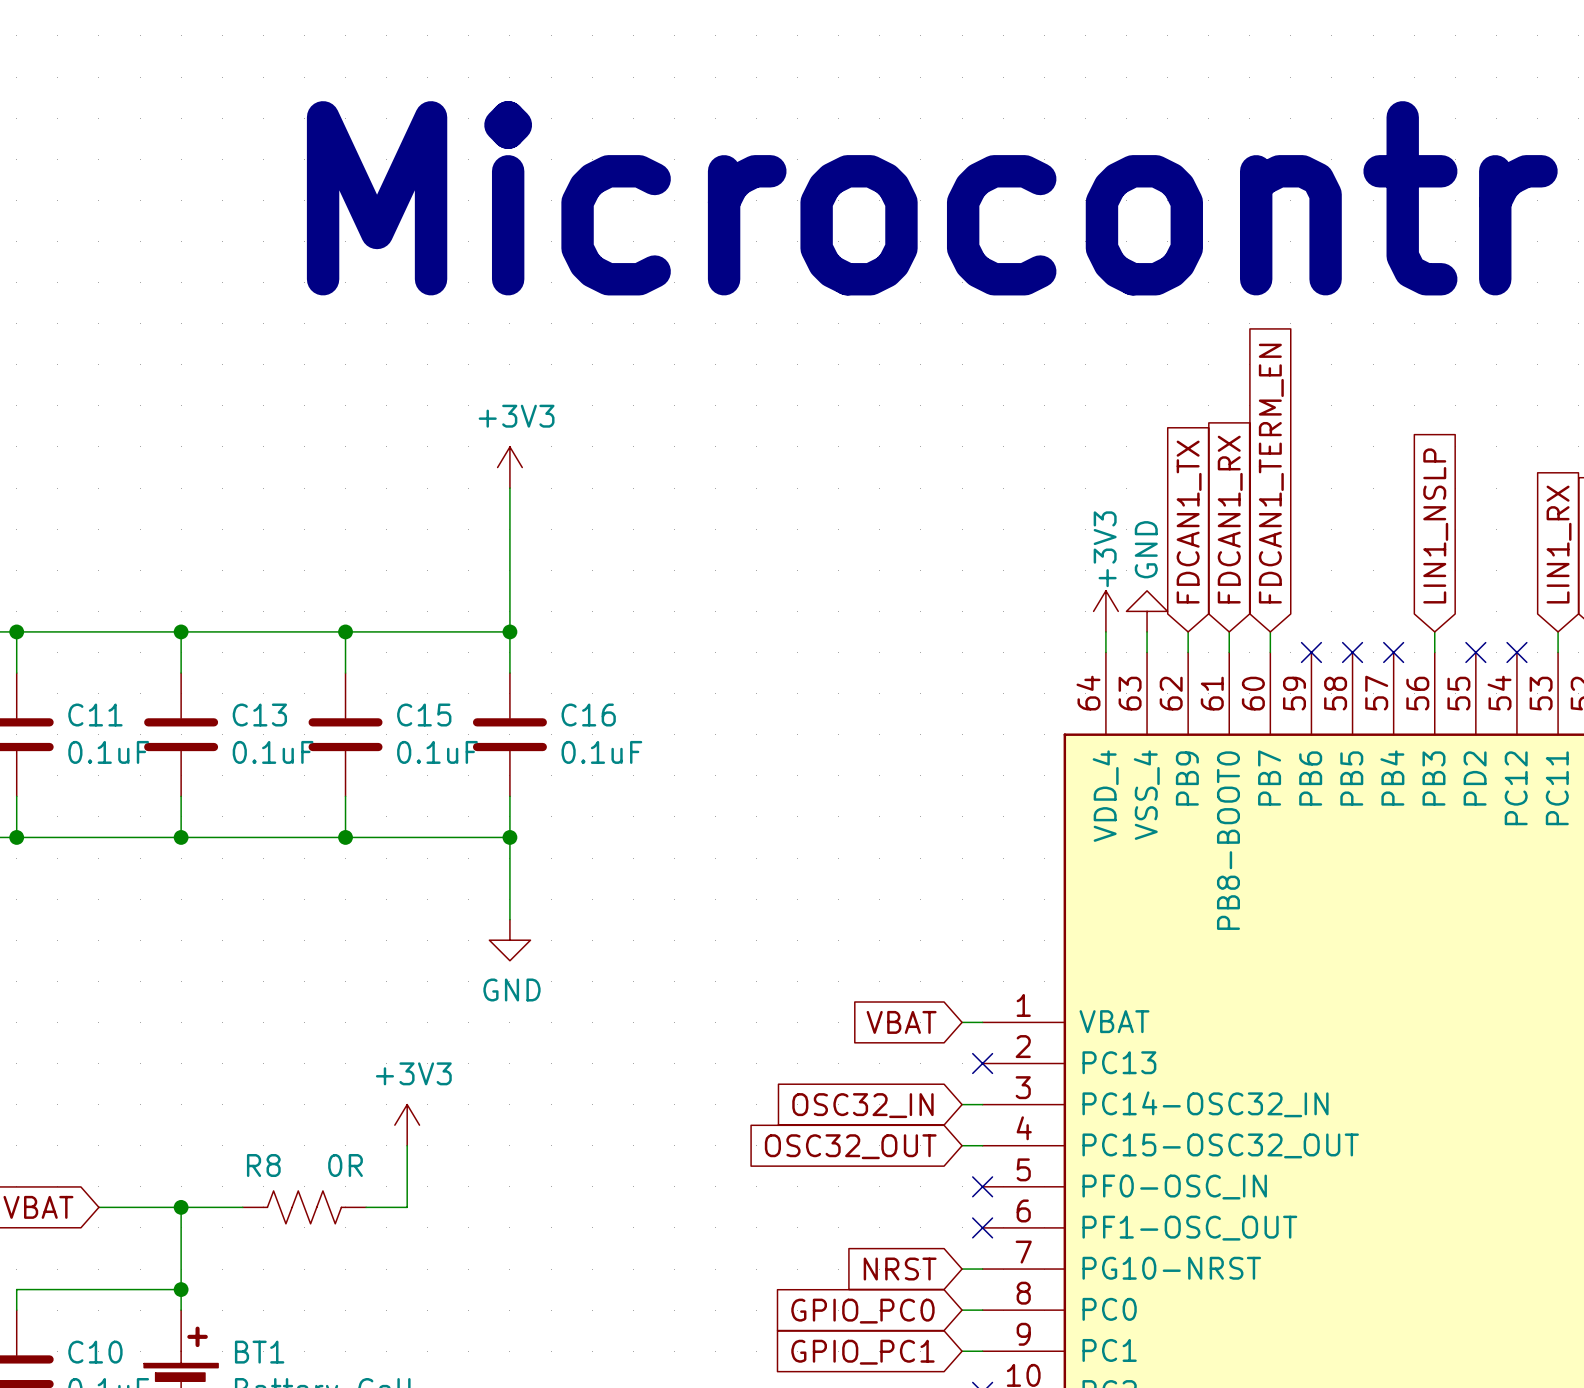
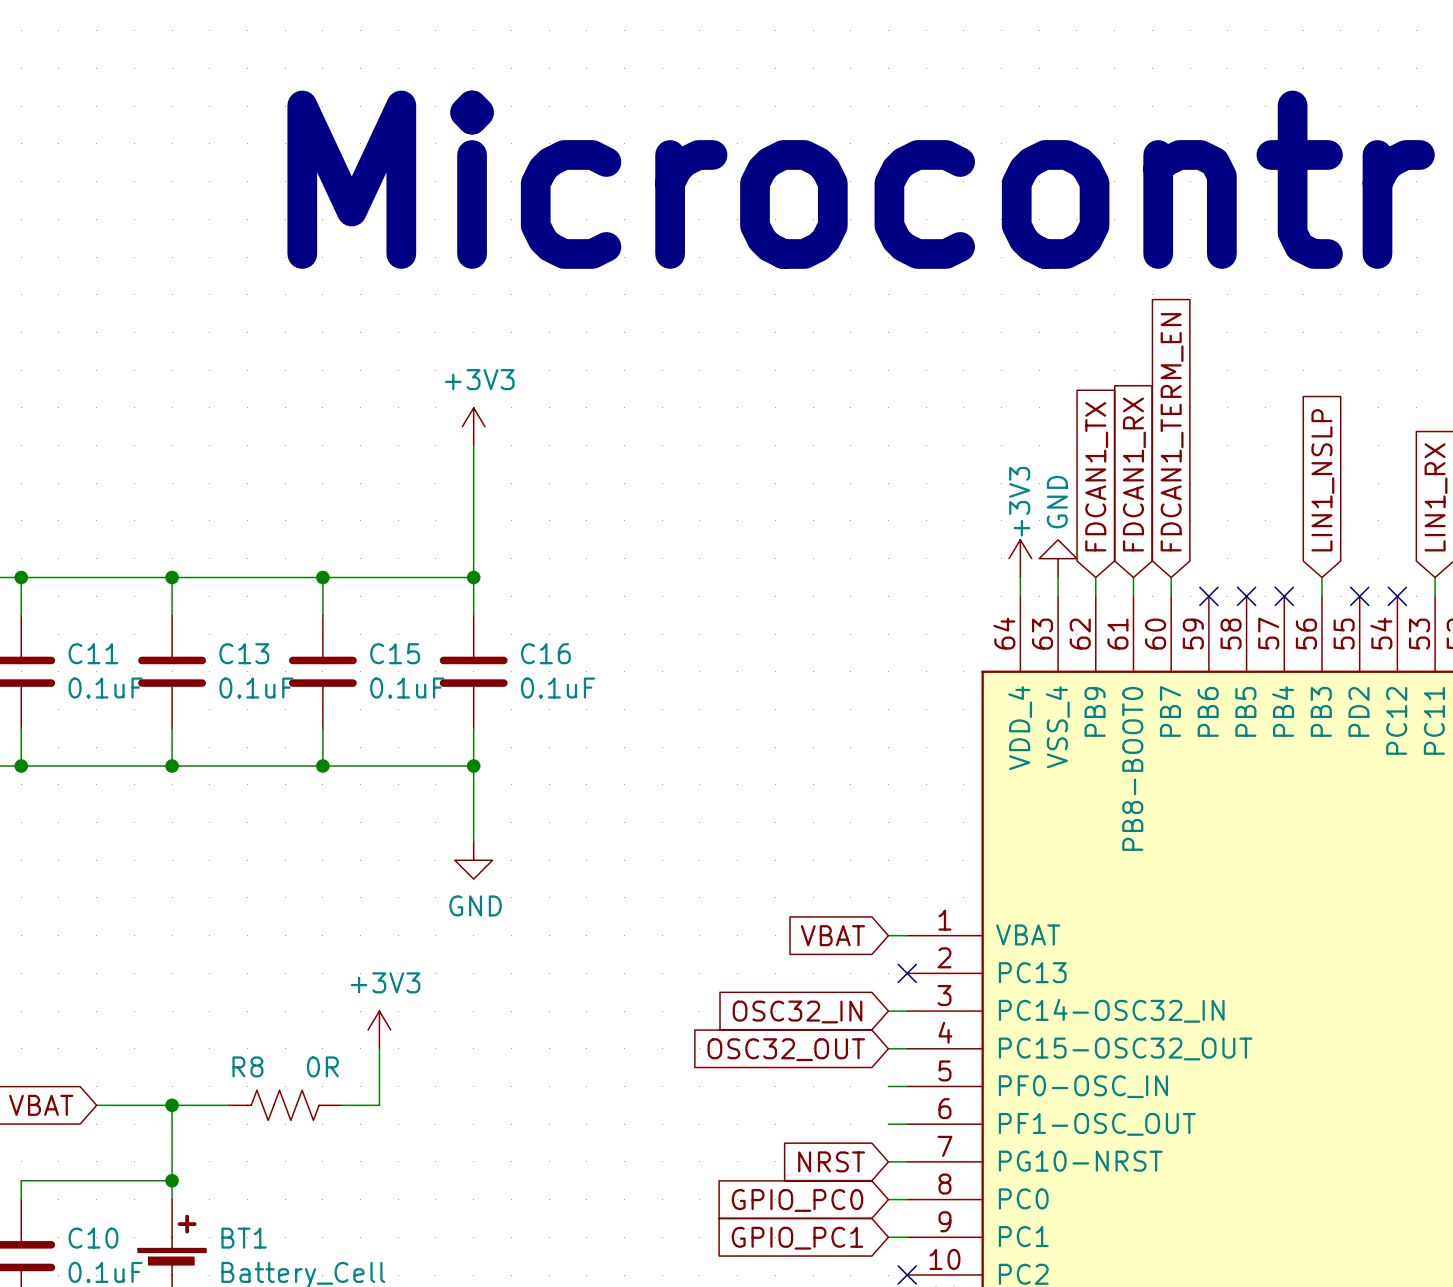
wire: none -> (888, 1086) (907, 1086)
no-connect mark: (982, 1186) -> none
wire: none -> (888, 1124) (907, 1124)
no-connect mark: (982, 1227) -> none

